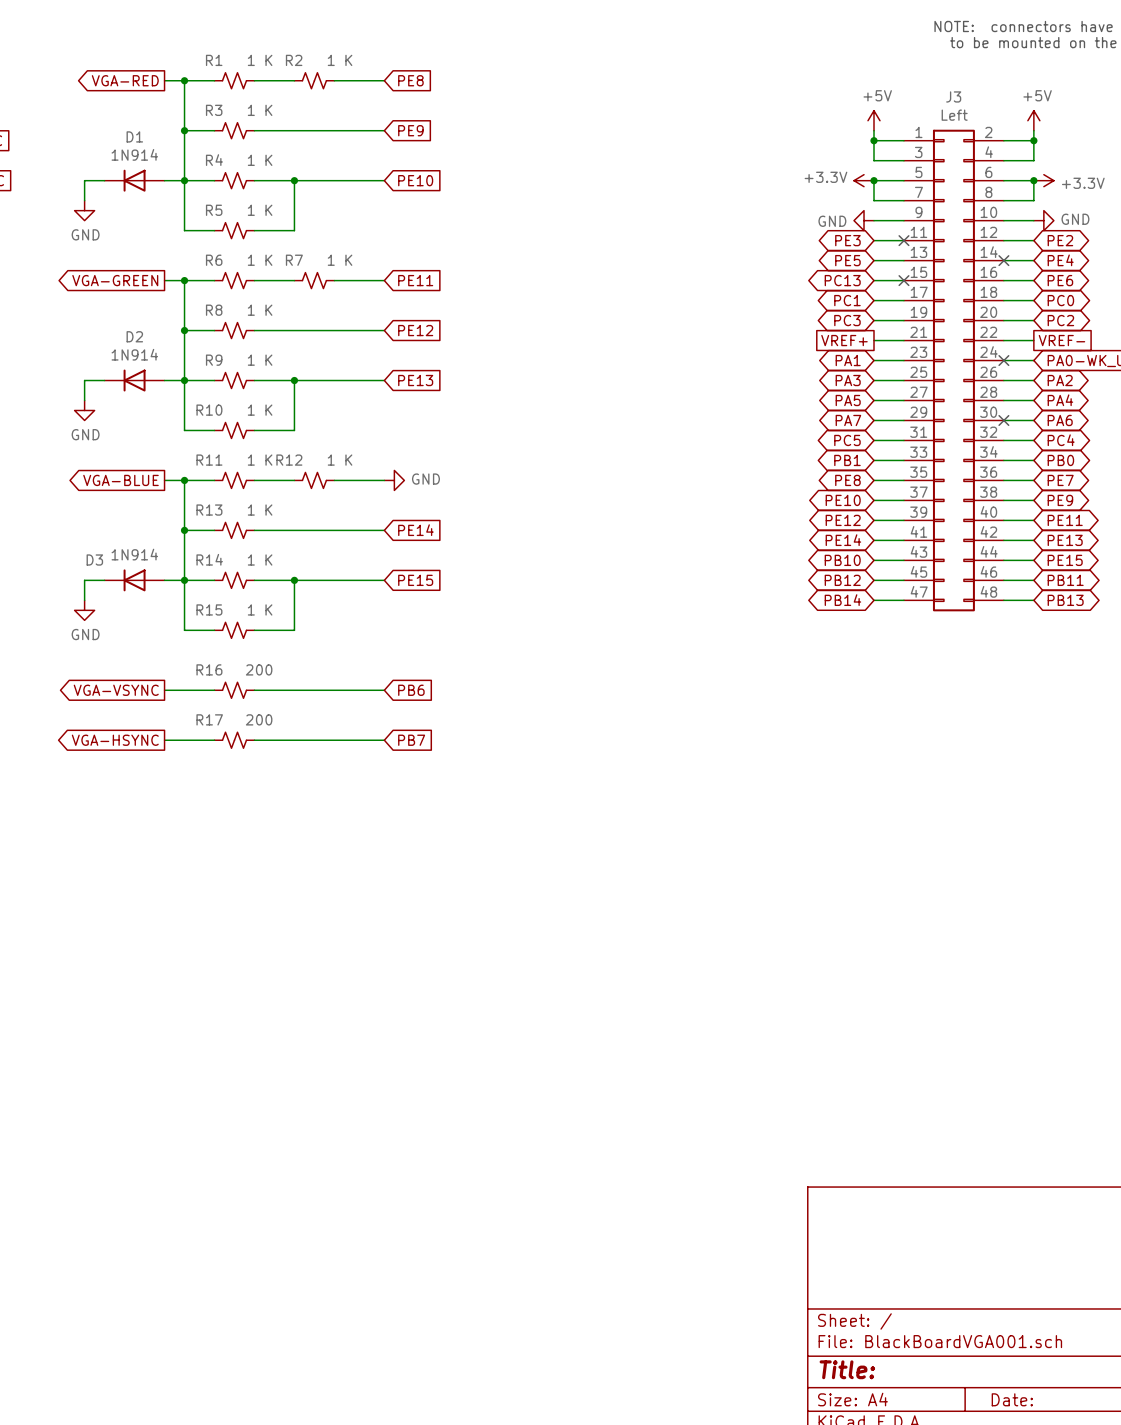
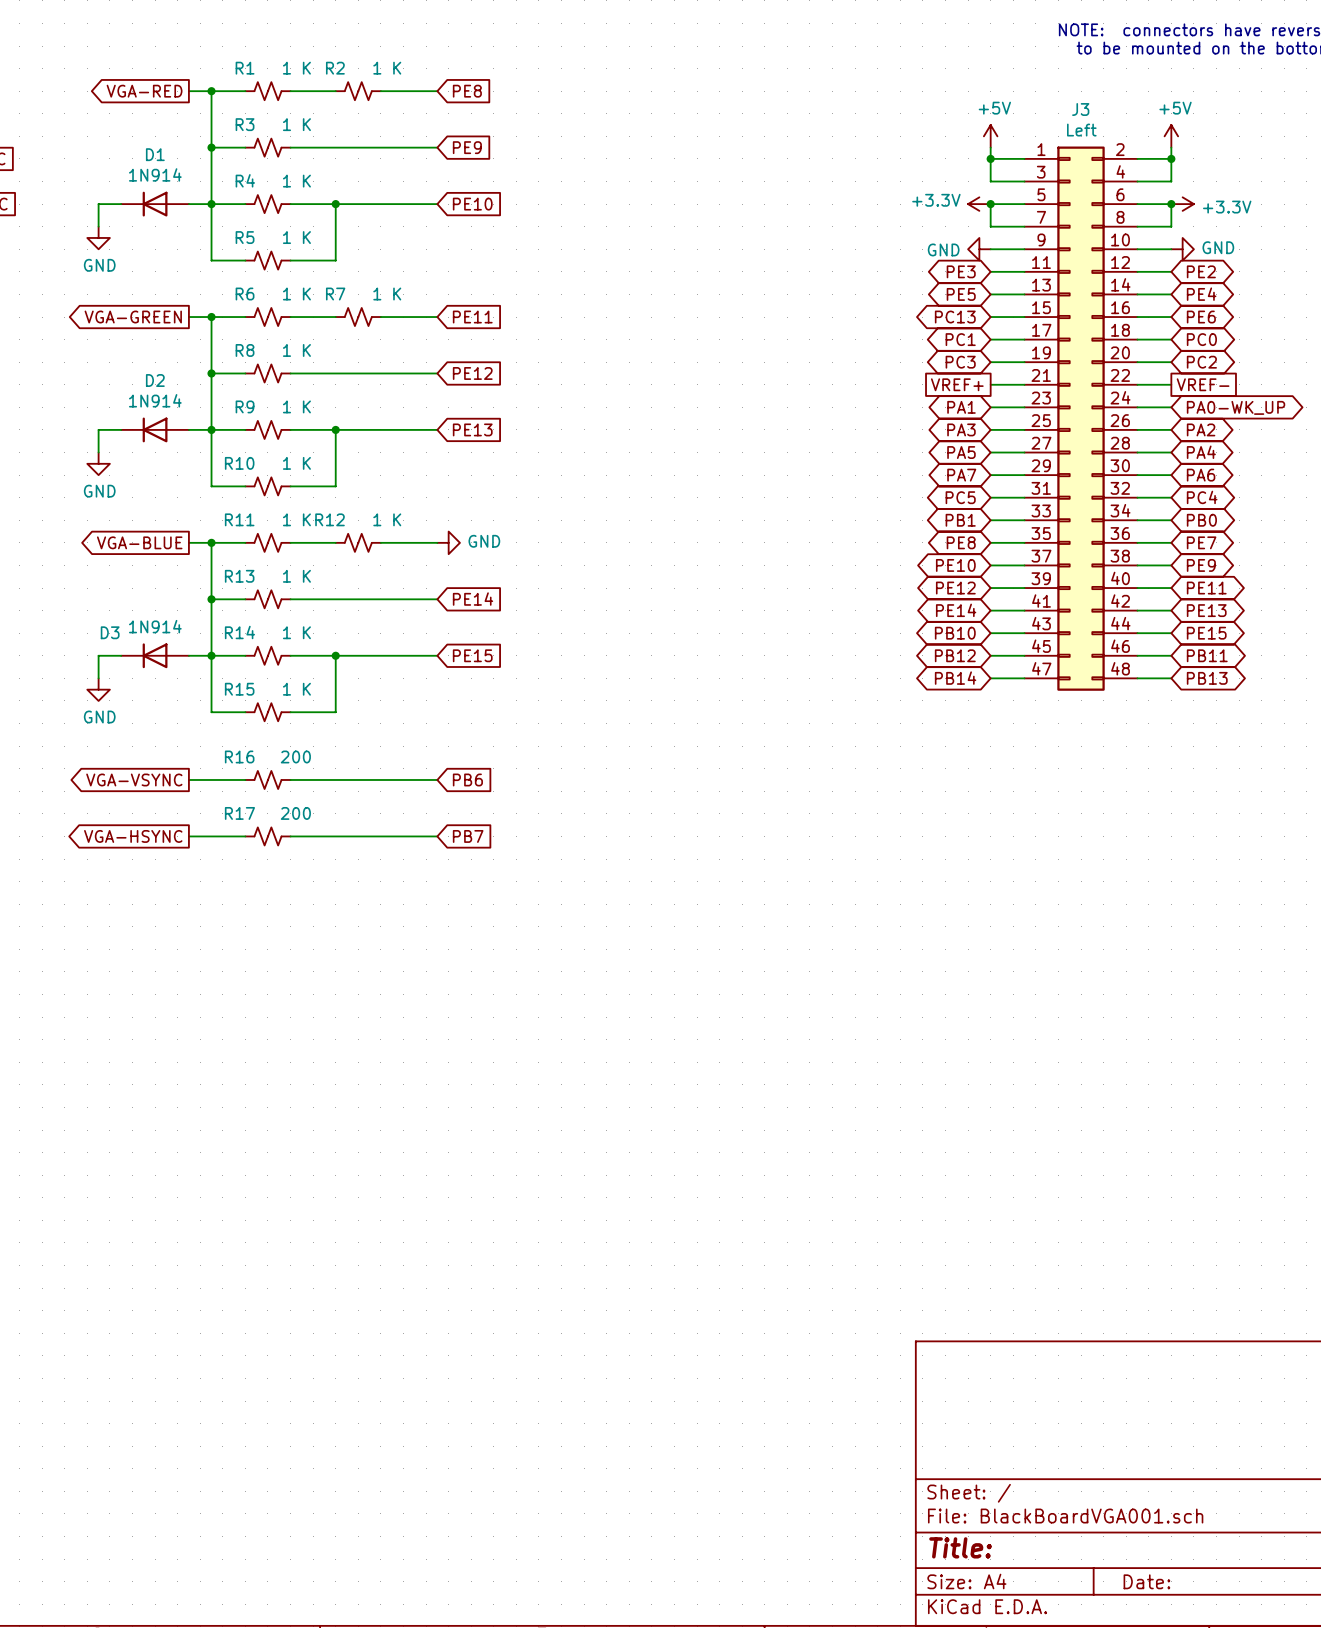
no-connect mark: (903, 240) -> none
no-connect mark: (1003, 260) -> none
no-connect mark: (903, 280) -> none
no-connect mark: (1003, 360) -> none
no-connect mark: (1003, 420) -> none

